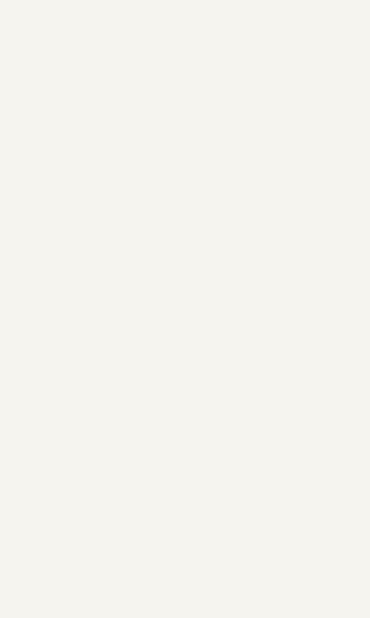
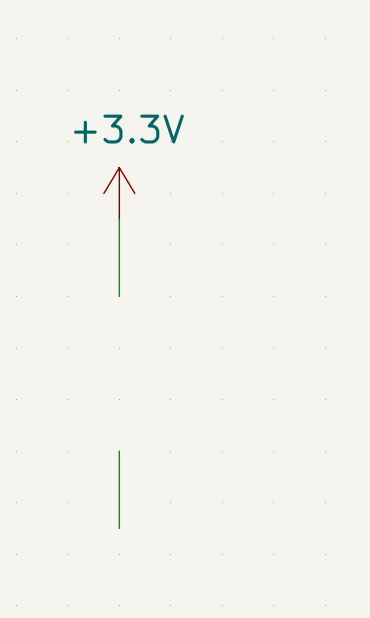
power symbol: none -> +3.3V (119, 193)
wire: none -> (119, 219) (119, 296)
wire: none -> (119, 451) (119, 528)

